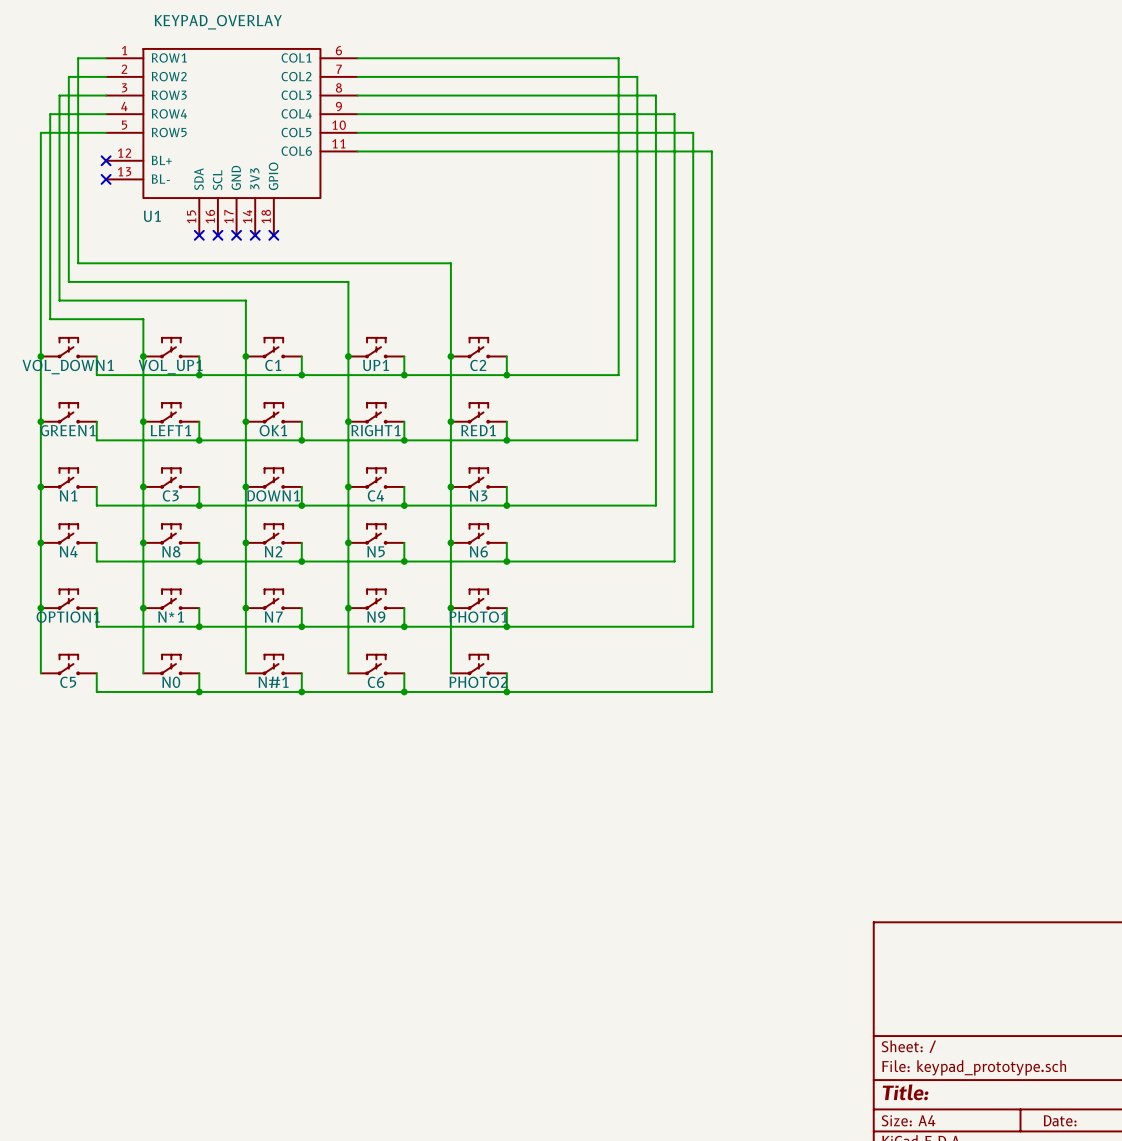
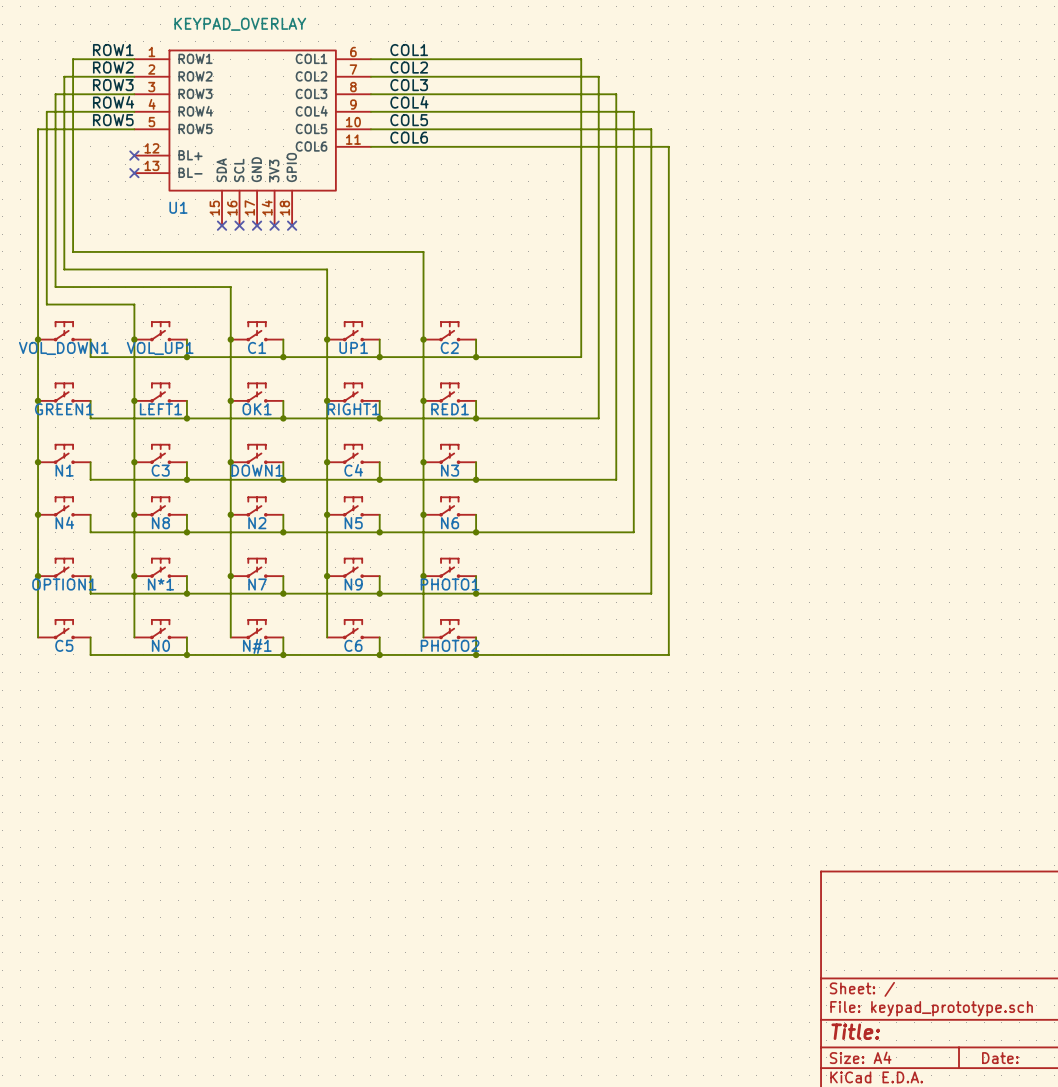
label: none -> ROW1 (113, 50)
label: none -> COL1 (409, 50)
label: none -> ROW2 (113, 67)
label: none -> COL2 (409, 67)
label: none -> ROW3 (113, 85)
label: none -> COL3 (409, 85)
label: none -> ROW4 (113, 102)
label: none -> COL4 (409, 102)
label: none -> ROW5 (113, 120)
label: none -> COL5 (409, 120)
label: none -> COL6 (409, 137)
U1 position: (231, 142) -> (252, 138)
no-connect mark: (106, 160) -> none
no-connect mark: none -> (134, 155)
no-connect mark: (106, 179) -> none
no-connect mark: none -> (134, 173)
no-connect mark: (199, 235) -> none
no-connect mark: (217, 235) -> none
no-connect mark: none -> (274, 225)
no-connect mark: none -> (292, 225)

